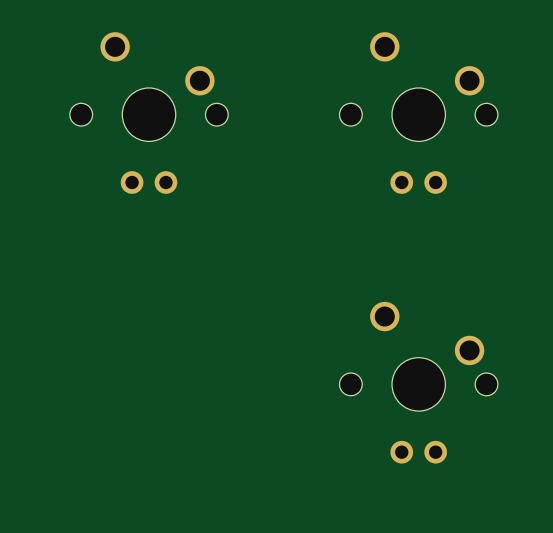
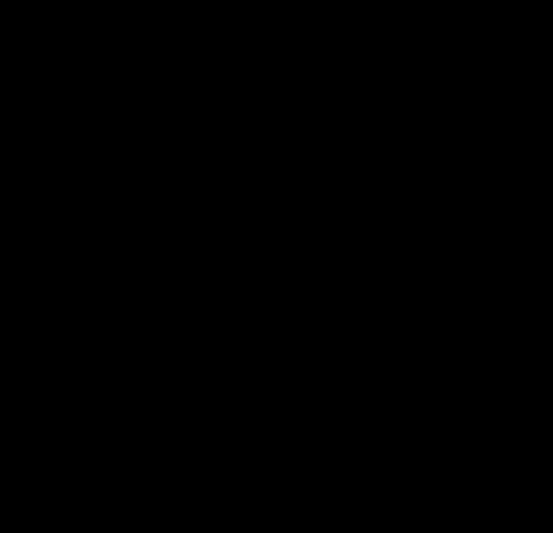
part: (149, 113) -> none
part: (418, 113) -> none
part: (418, 382) -> none

